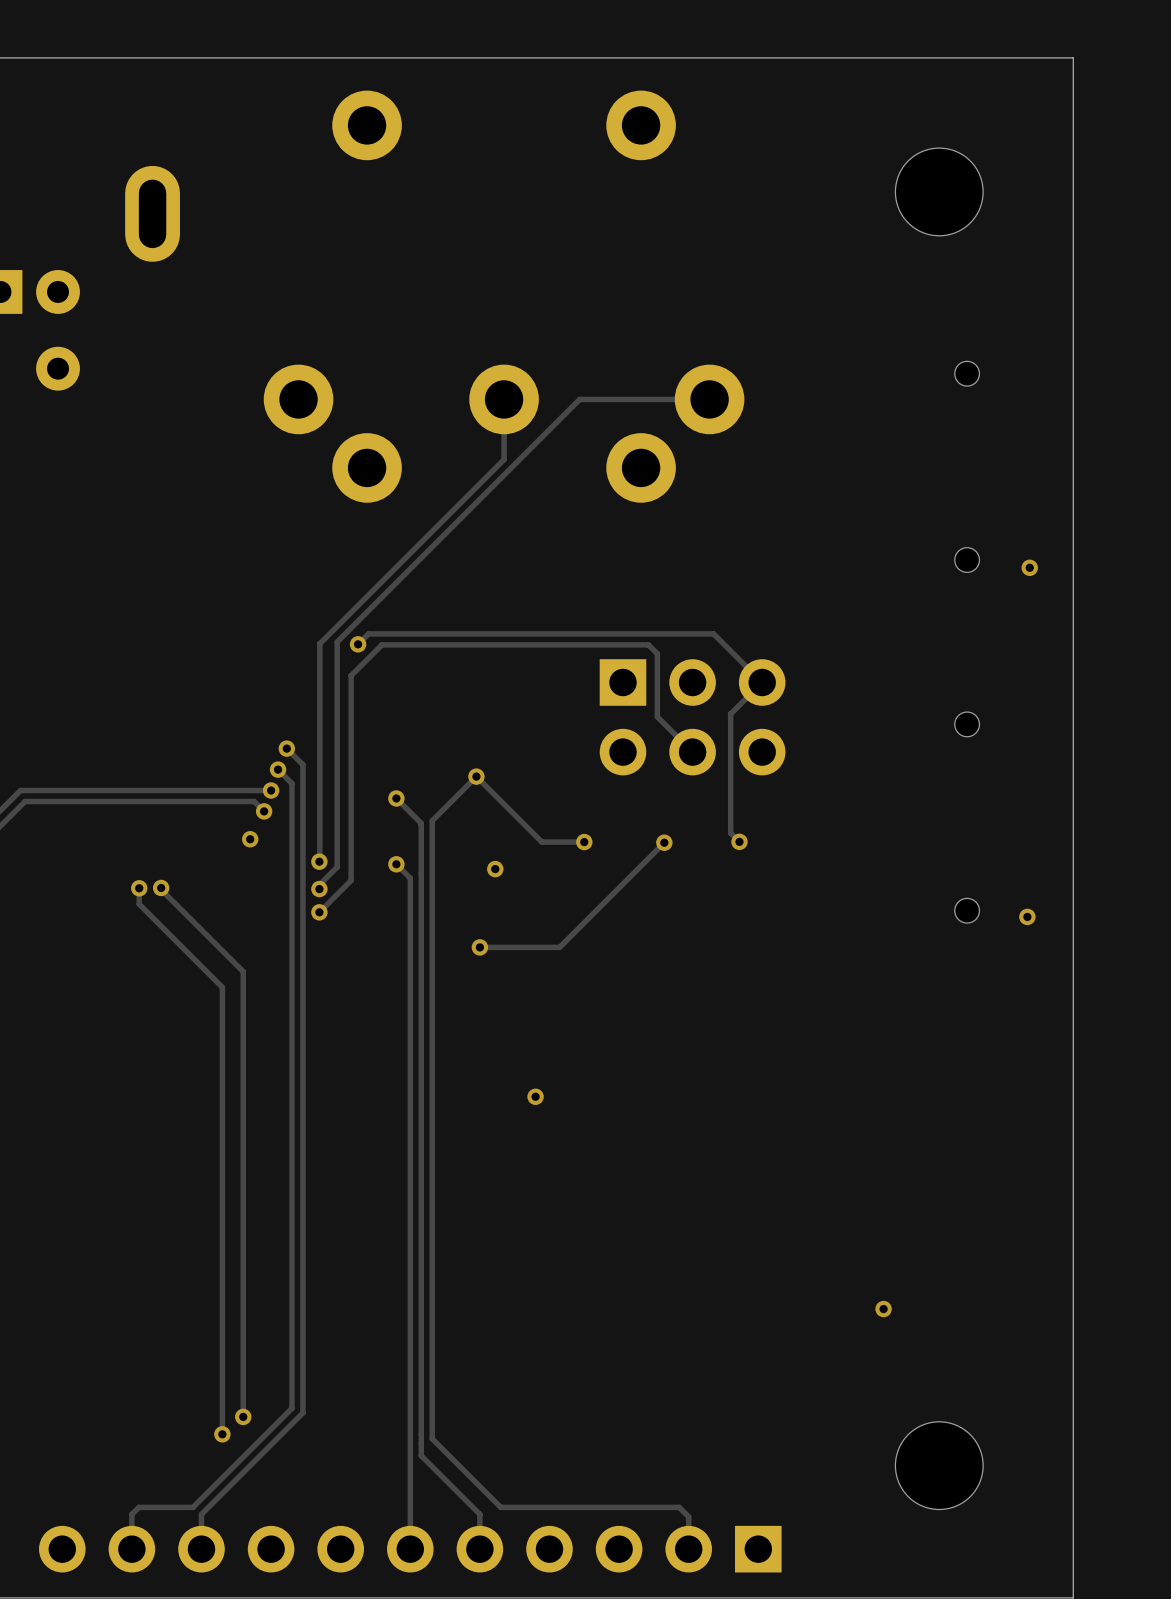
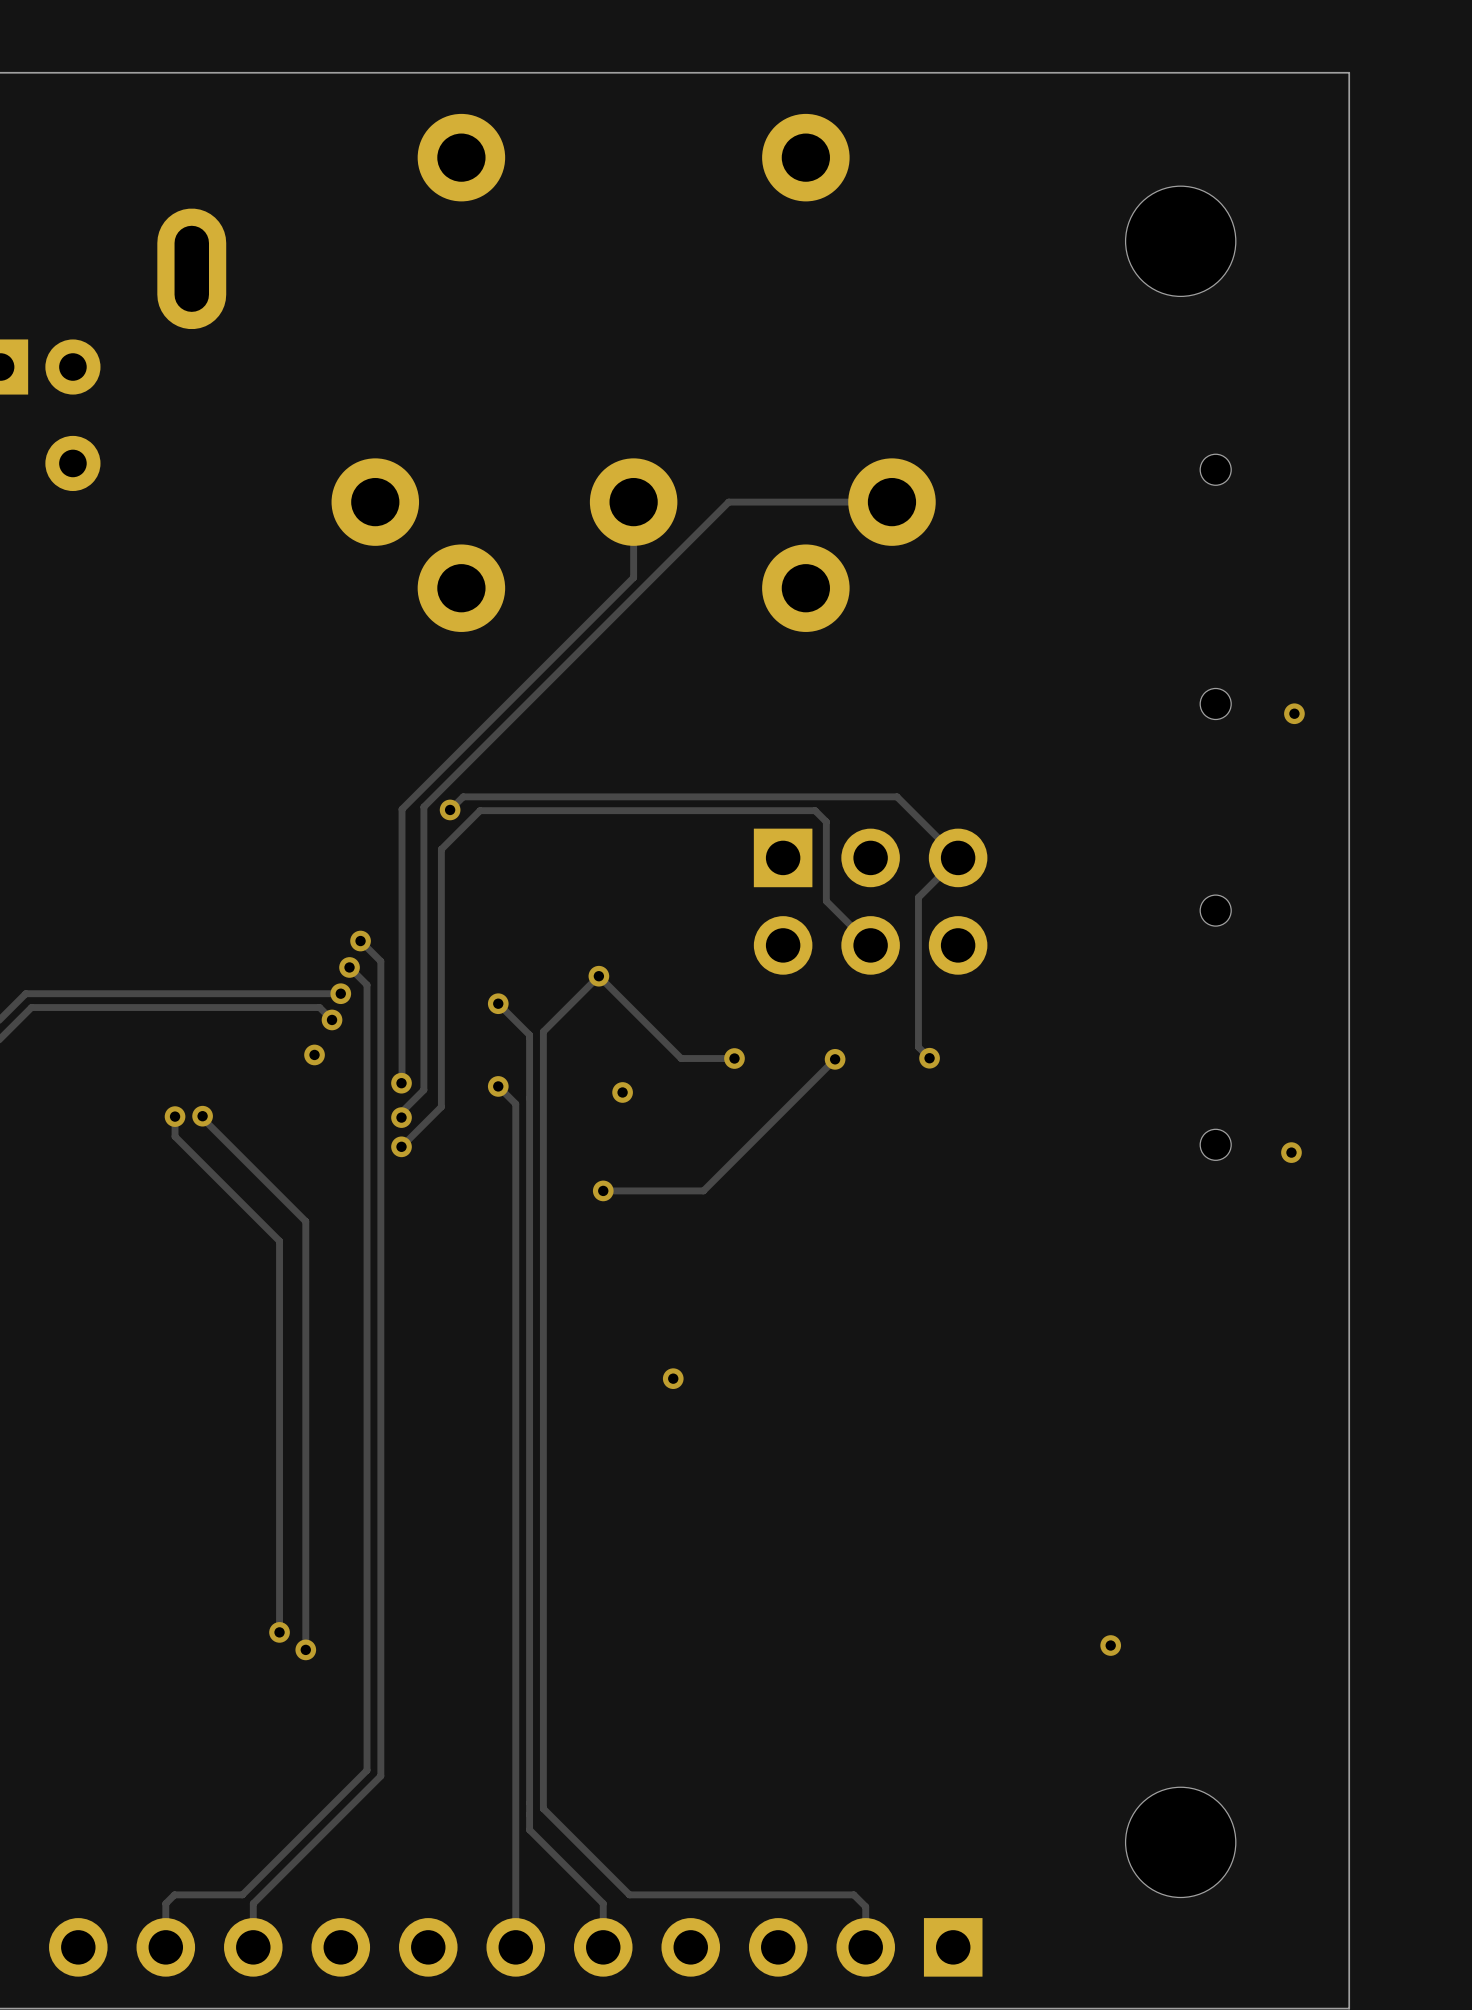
track: (222, 1298) (222, 1434) -> none
via: none -> (279, 1632)
track: (243, 1312) (243, 1416) -> none
via: none -> (305, 1649)
via: (243, 1416) -> none
via: (222, 1434) -> none

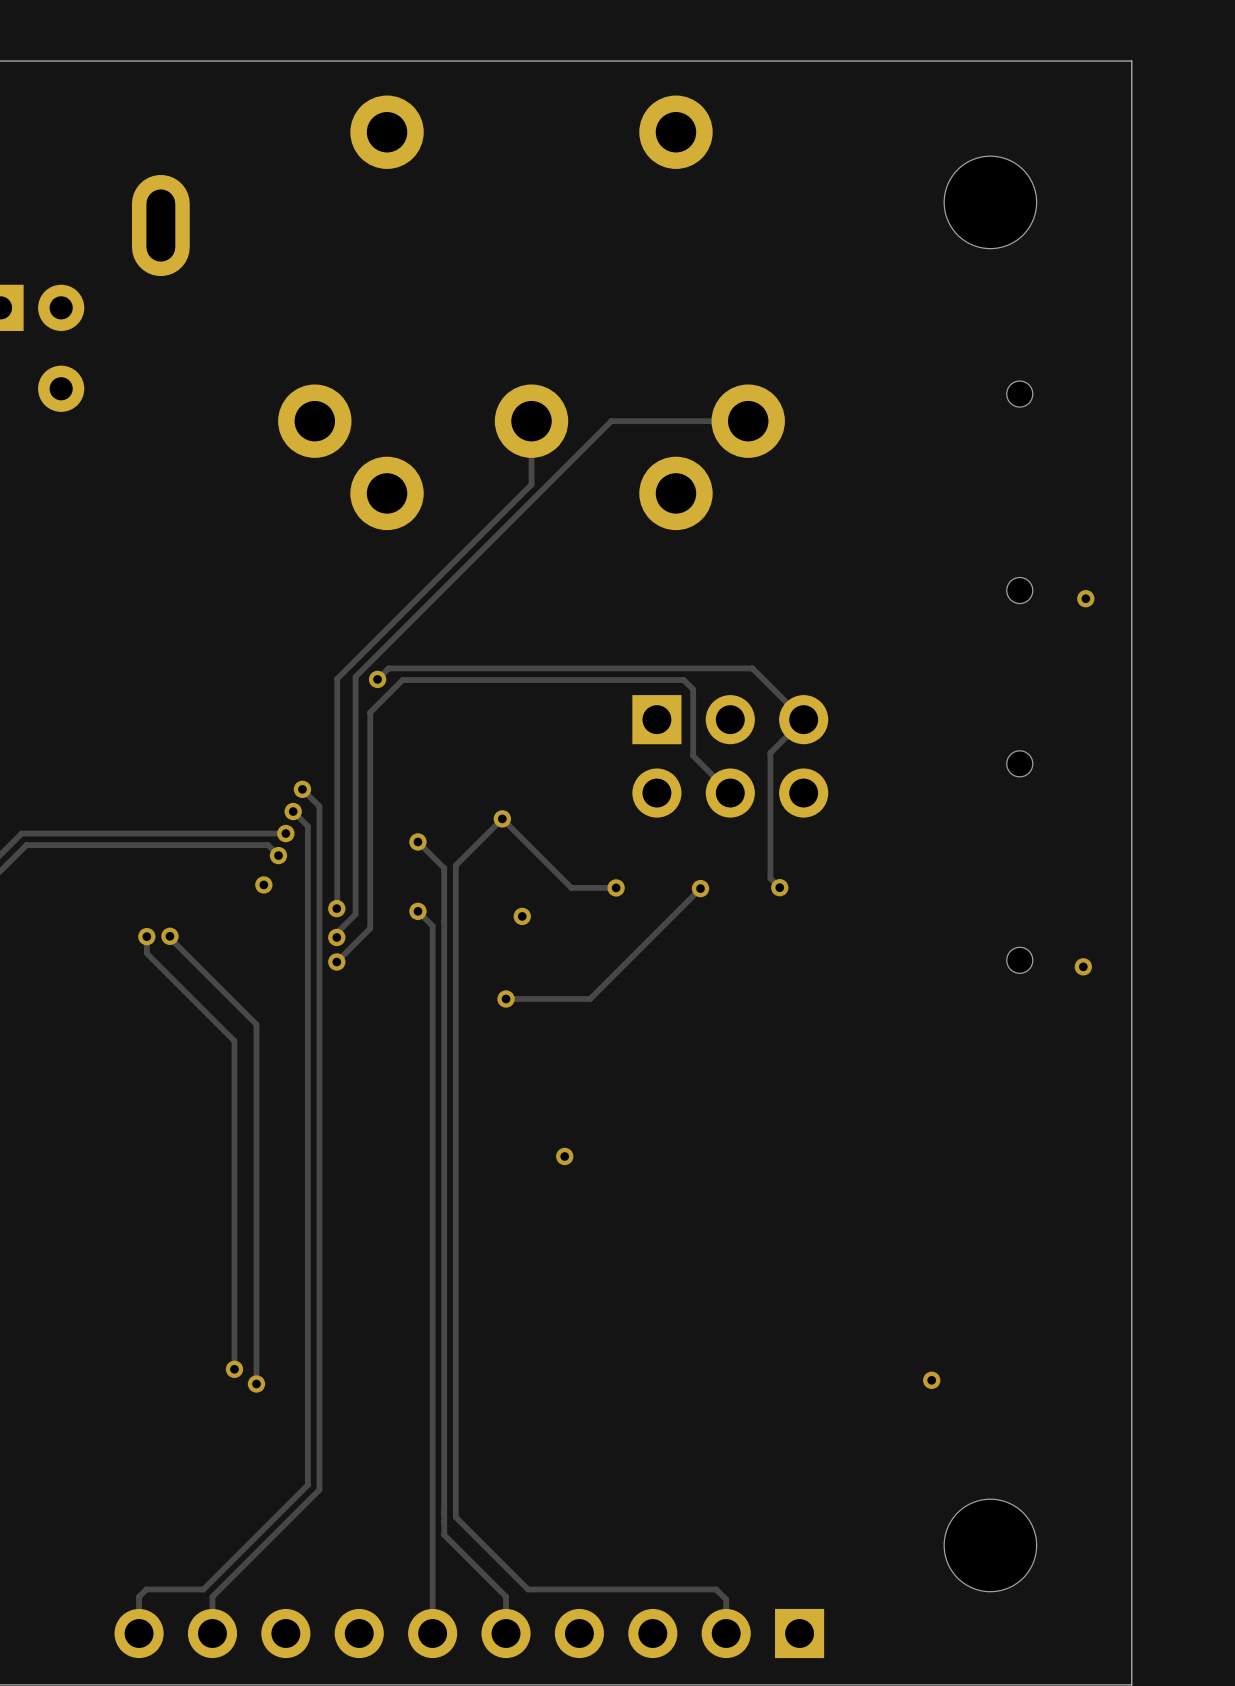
part: (515, 1947) -> none

